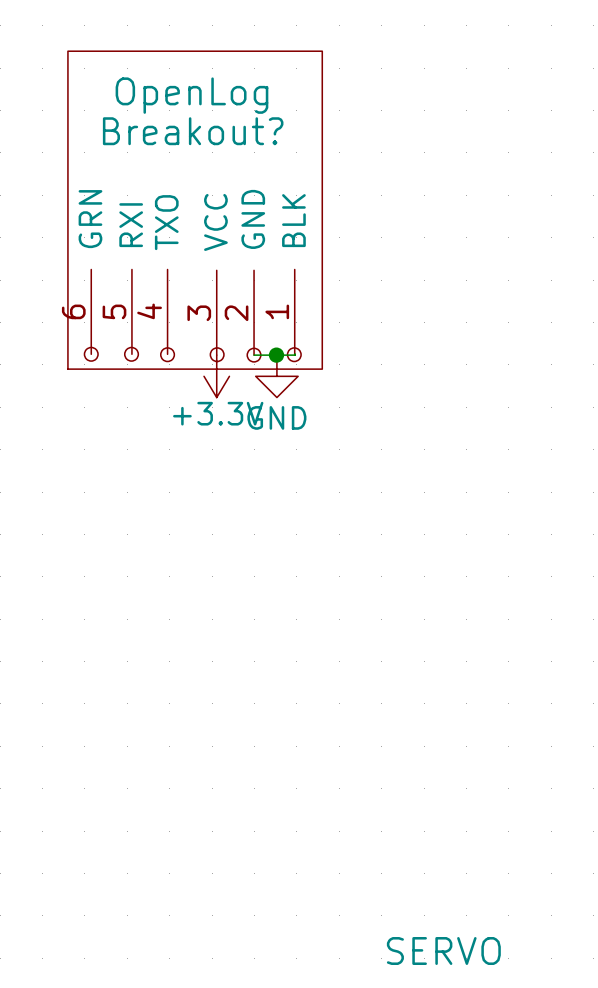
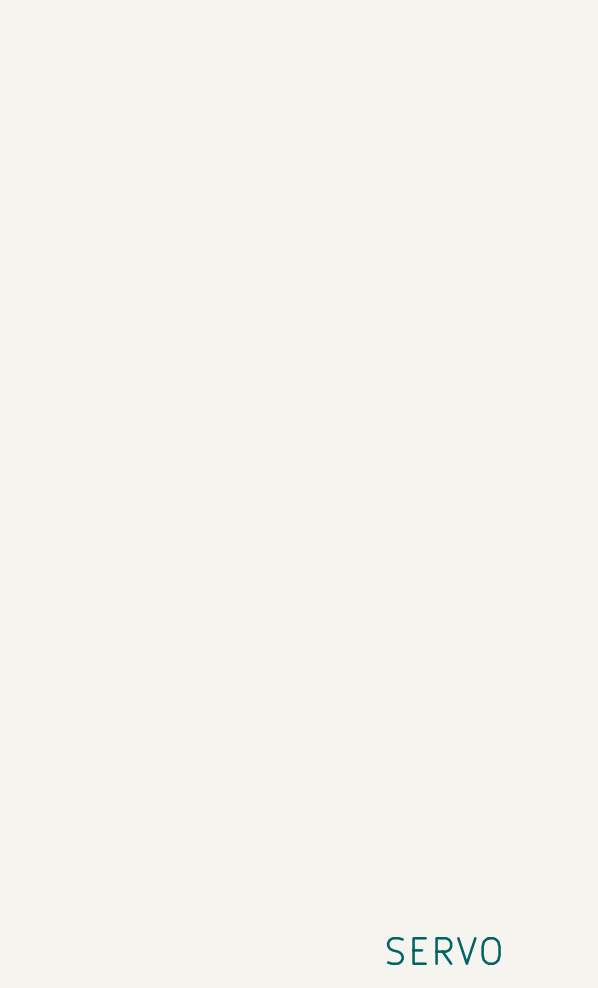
Breakout?: OpenLog (195, 210) -> none
wire: (294, 354) (254, 355) -> none
junction: (276, 355) -> none
power symbol: +3.3V (216, 376) -> none
power symbol: GND (276, 376) -> none

